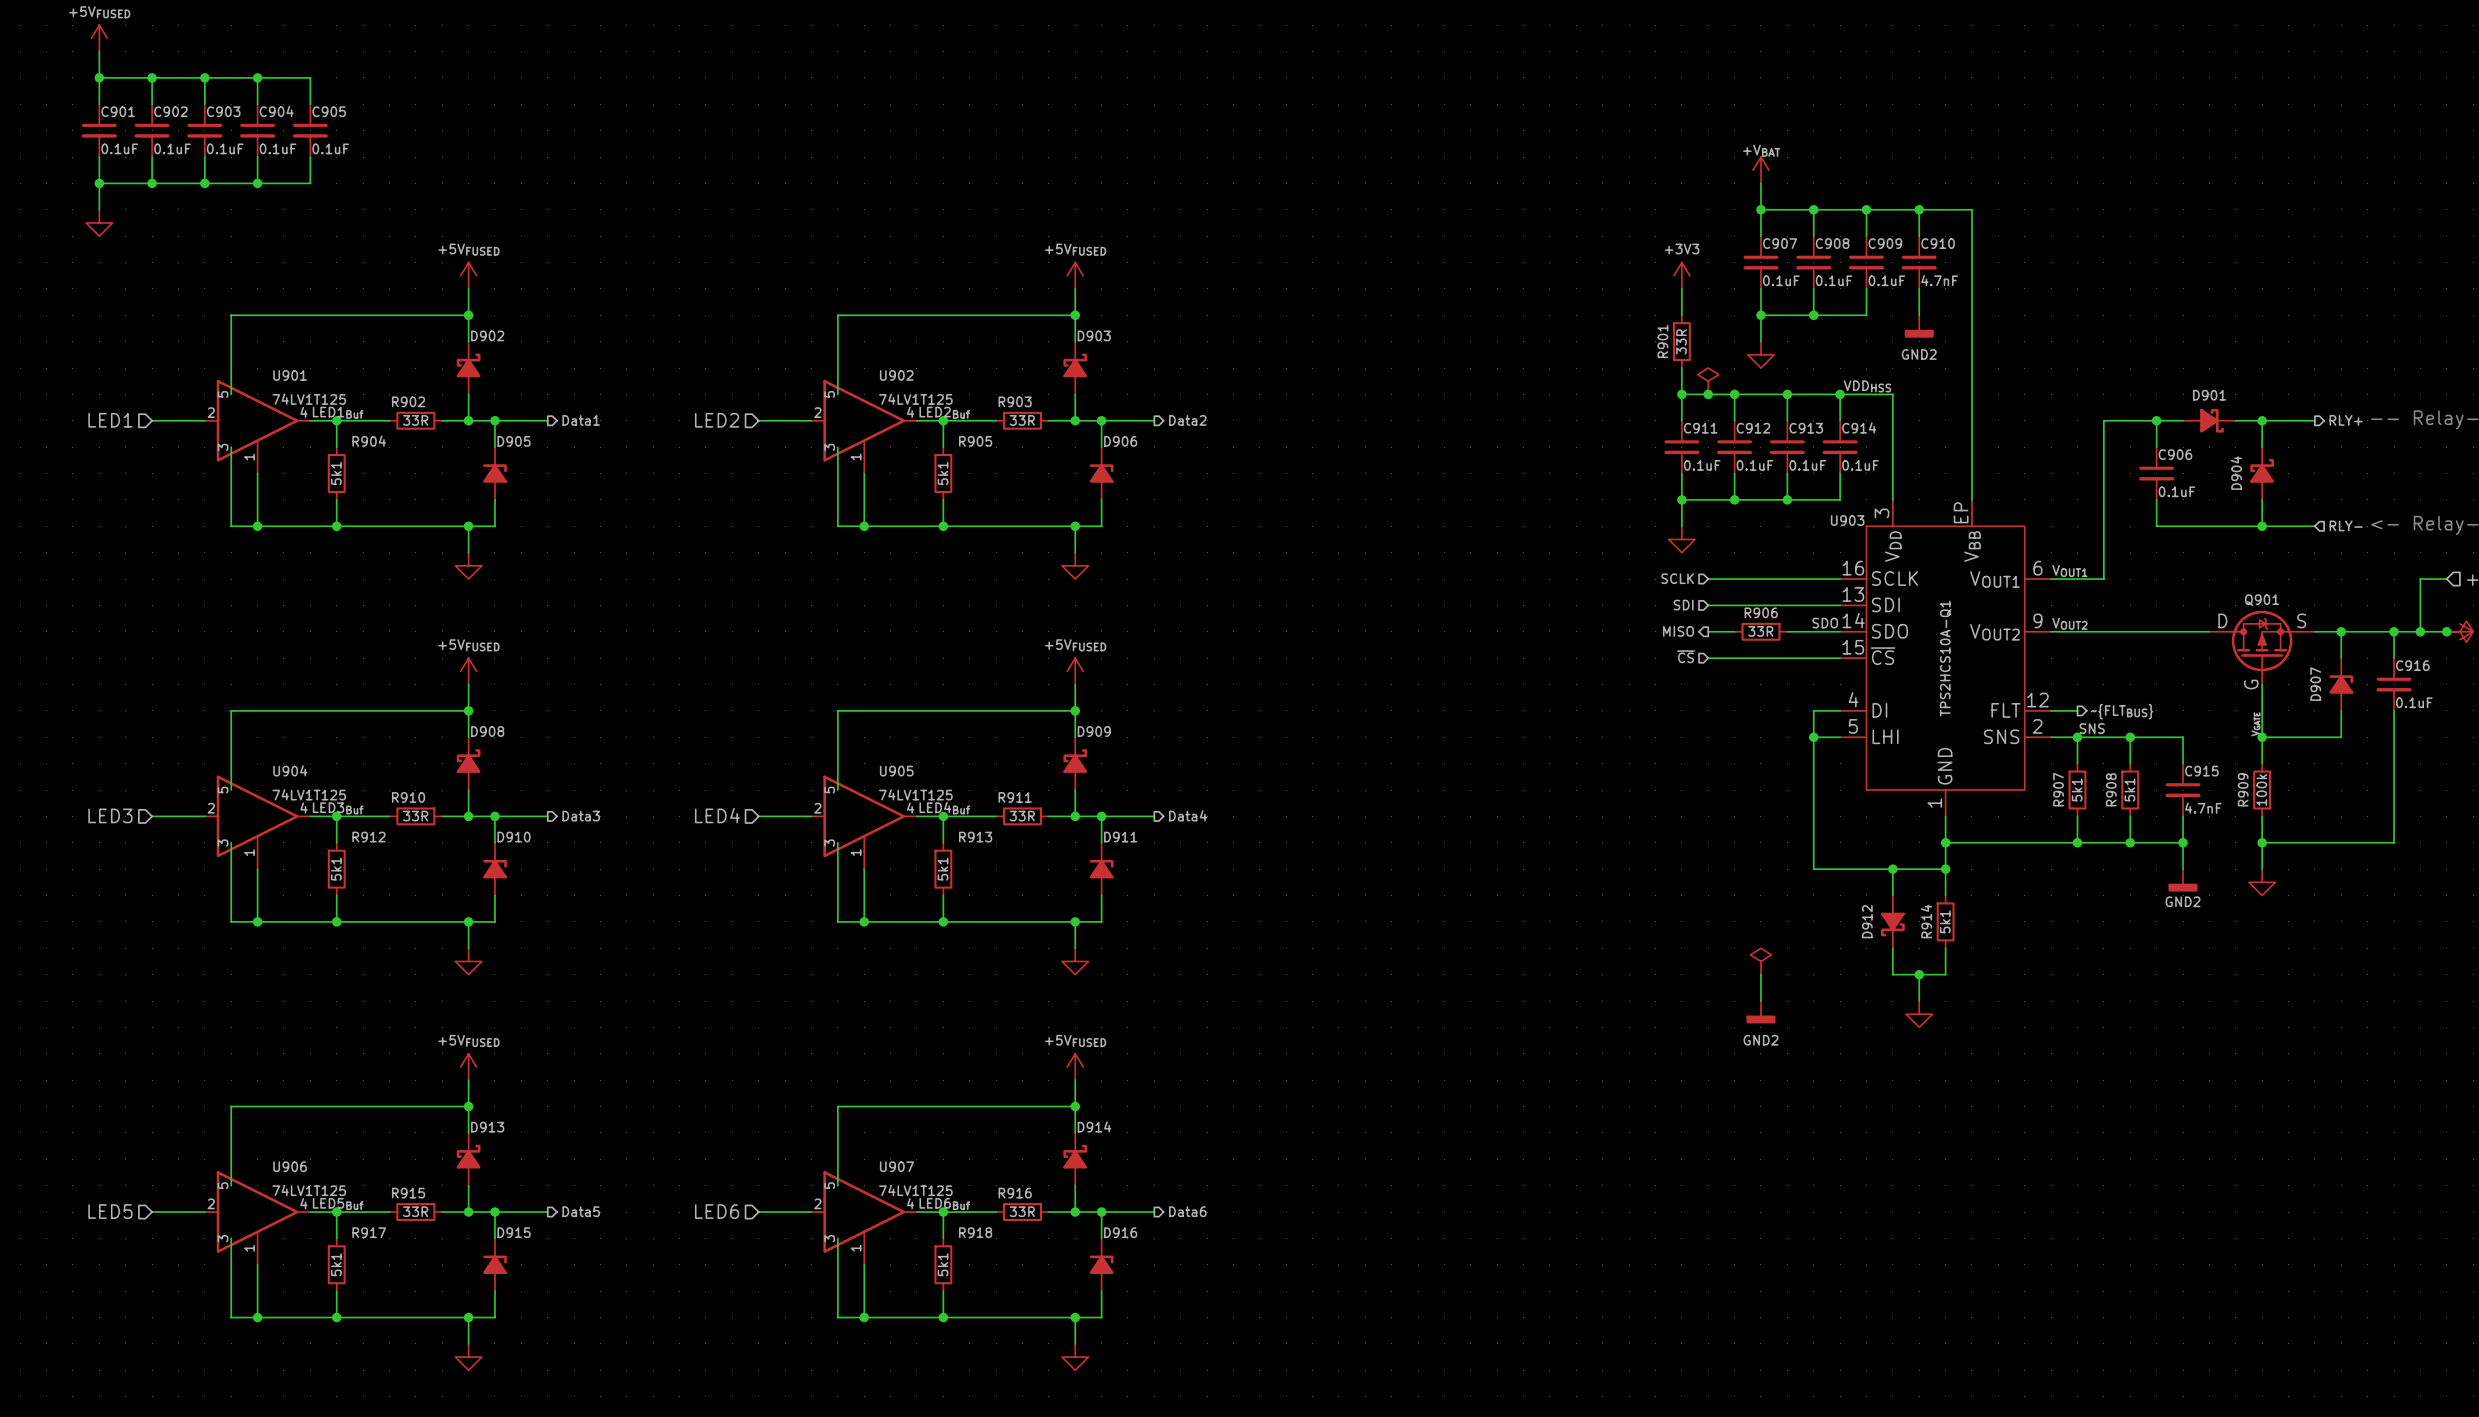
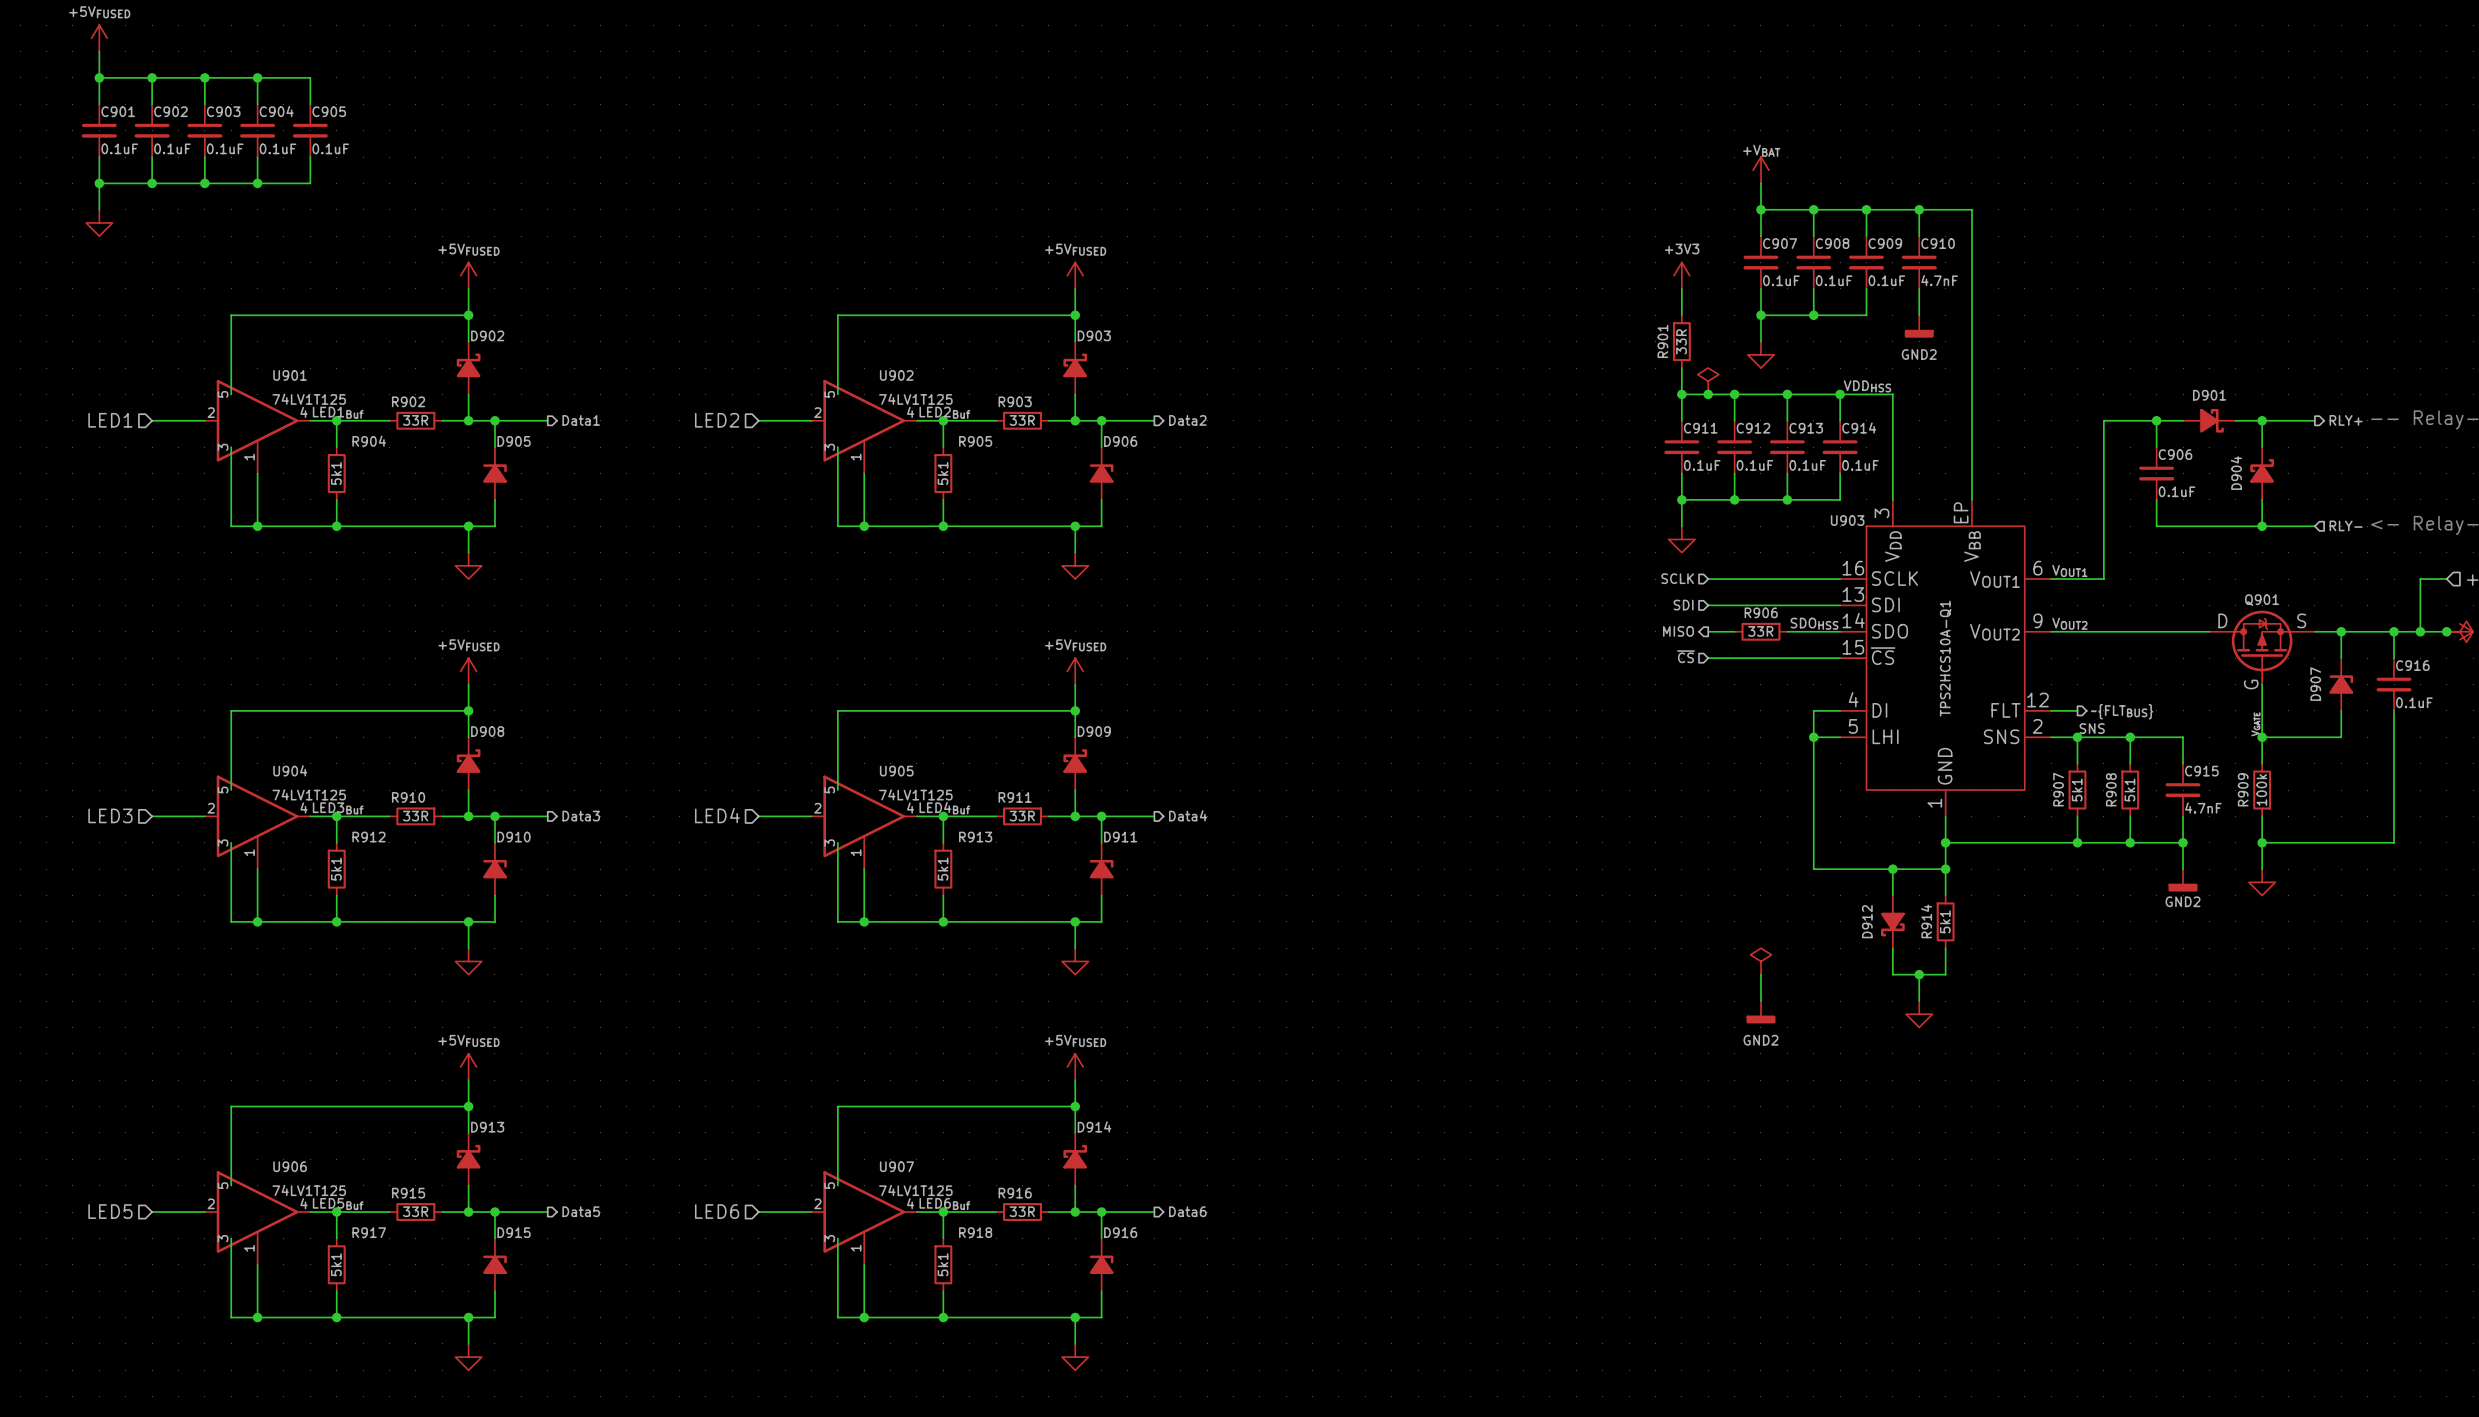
label: SDO (1825, 623) -> SDOHSS (1814, 623)

